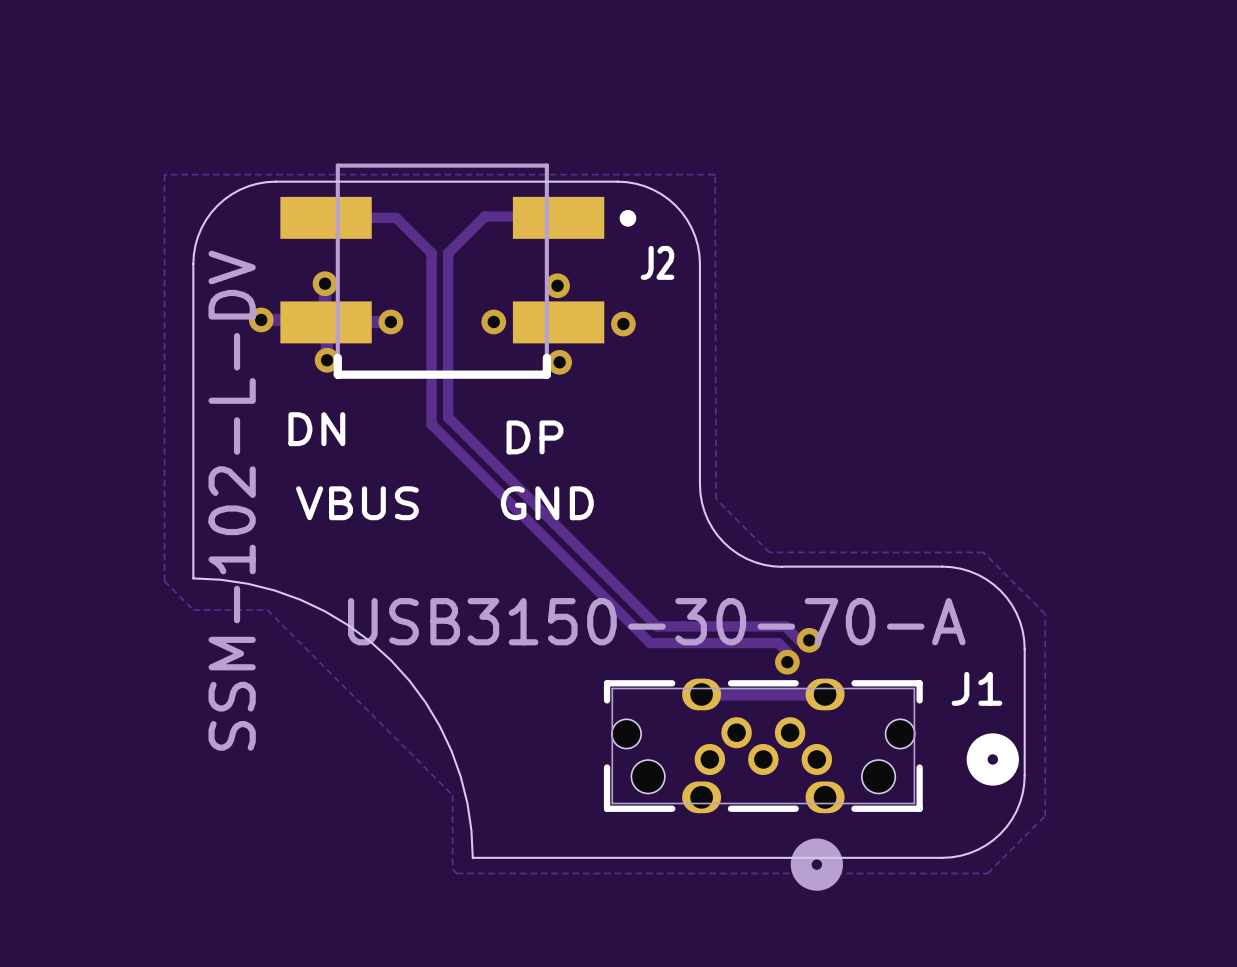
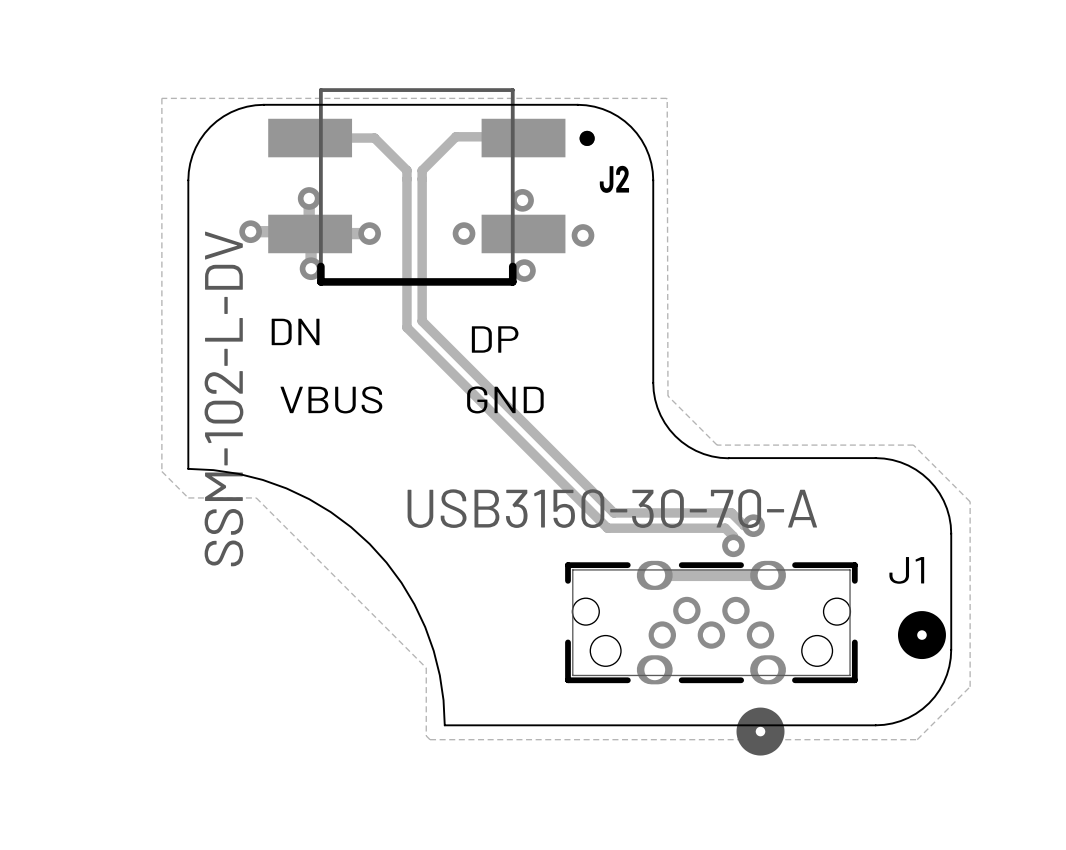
J1 footprint: [603, 678, 1019, 891] -> [565, 560, 946, 756]

